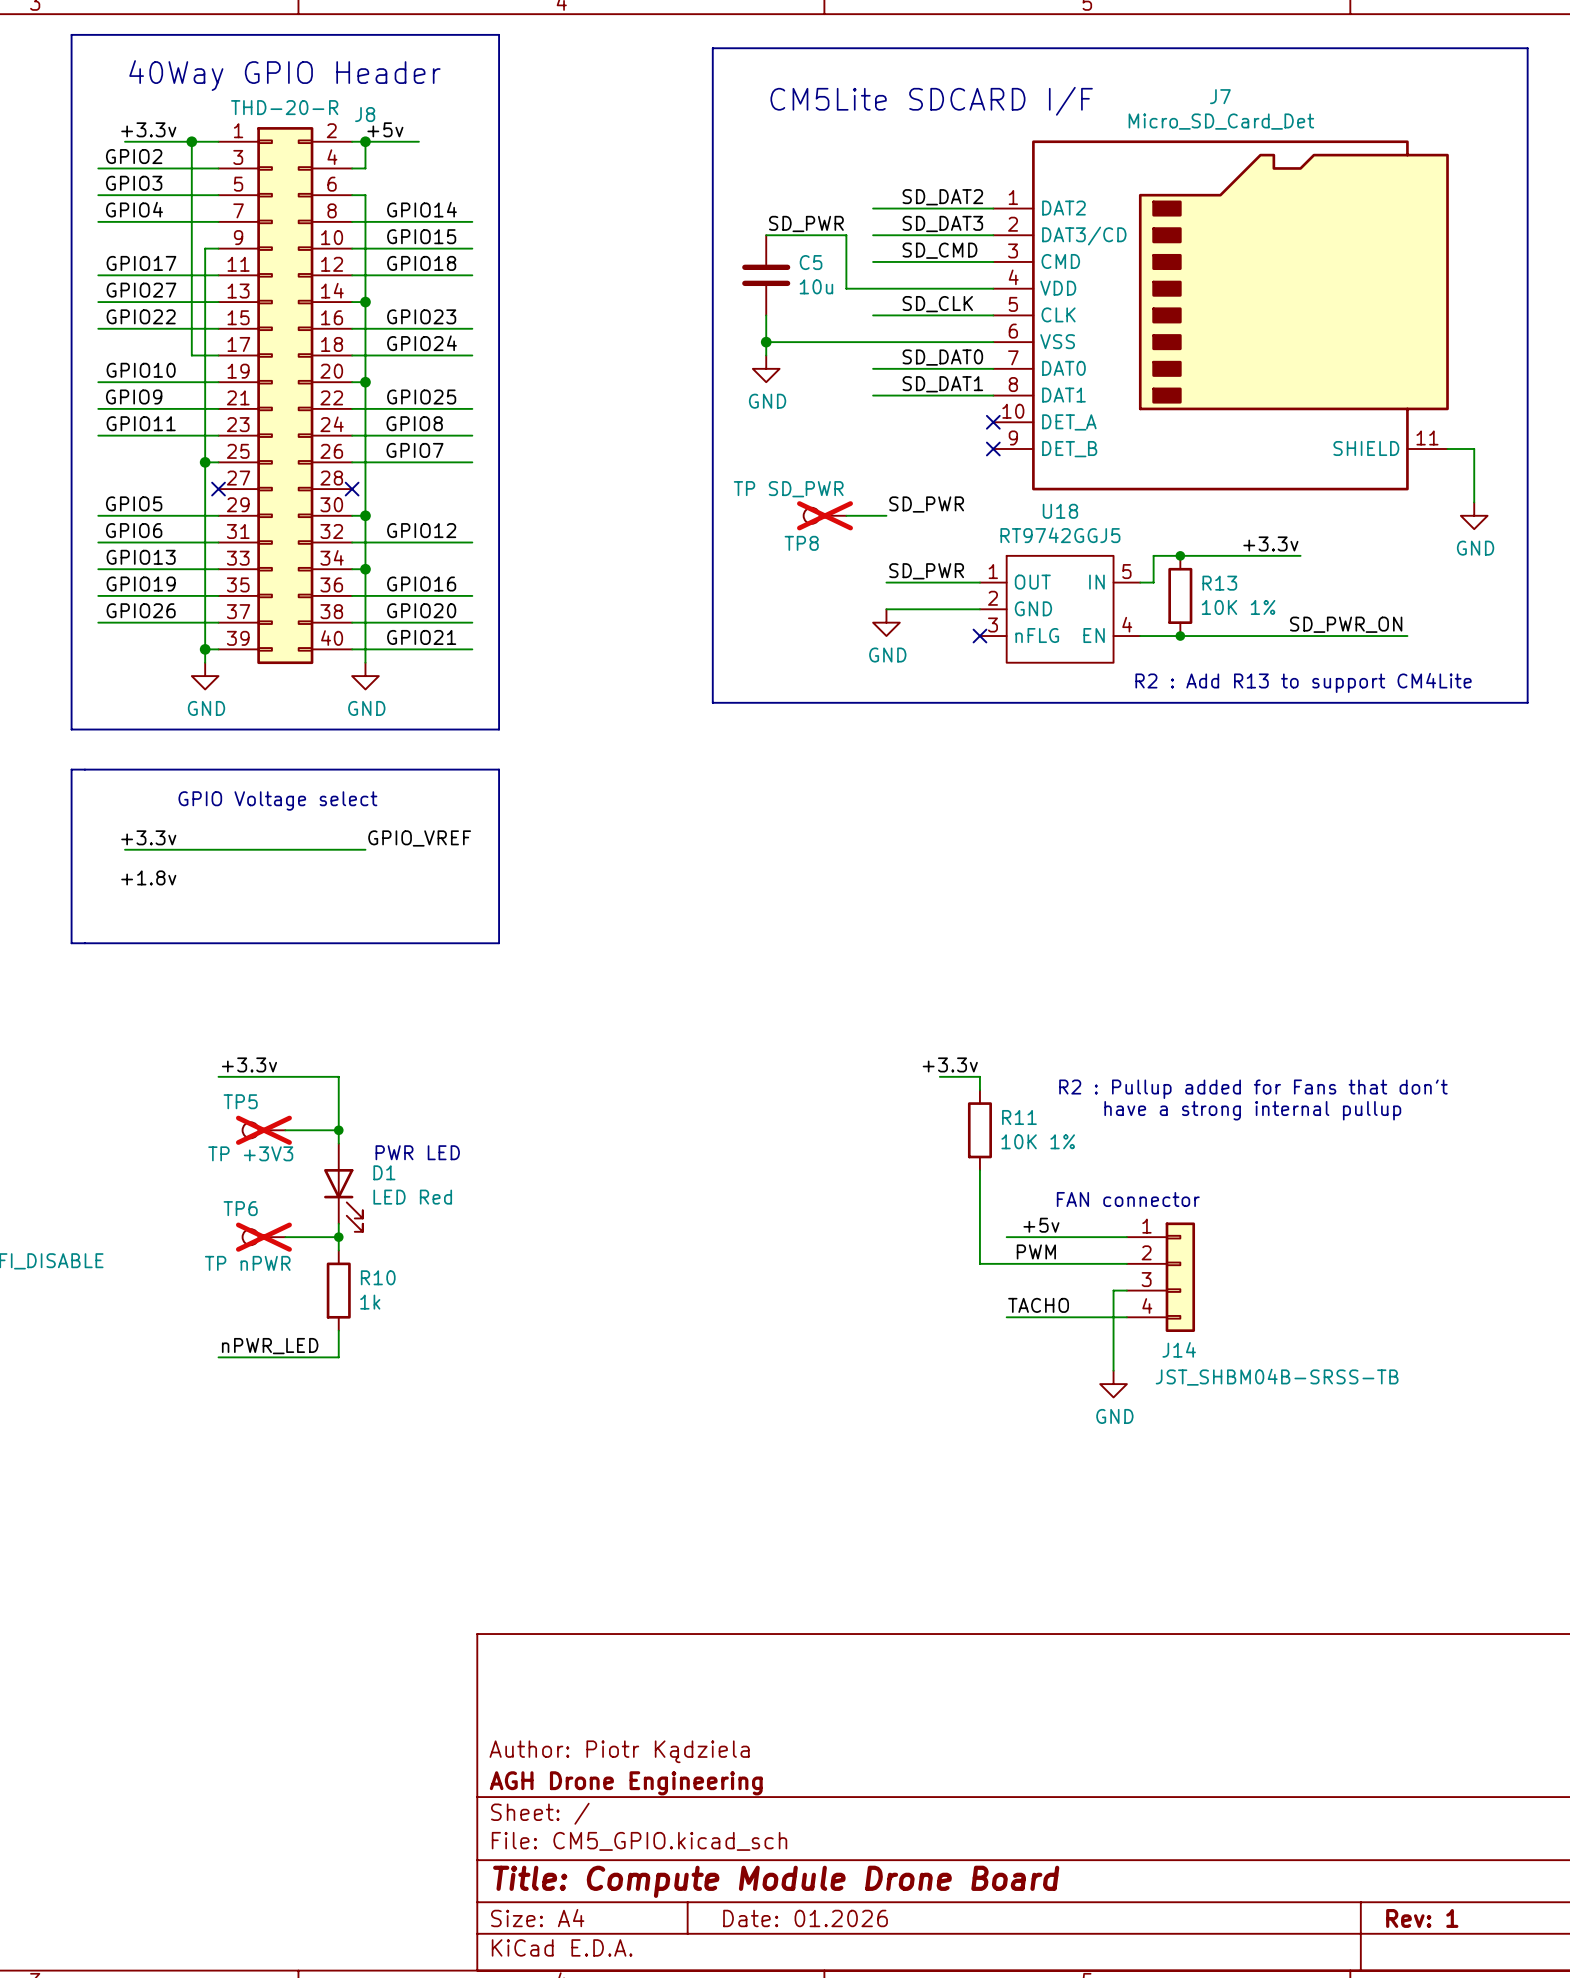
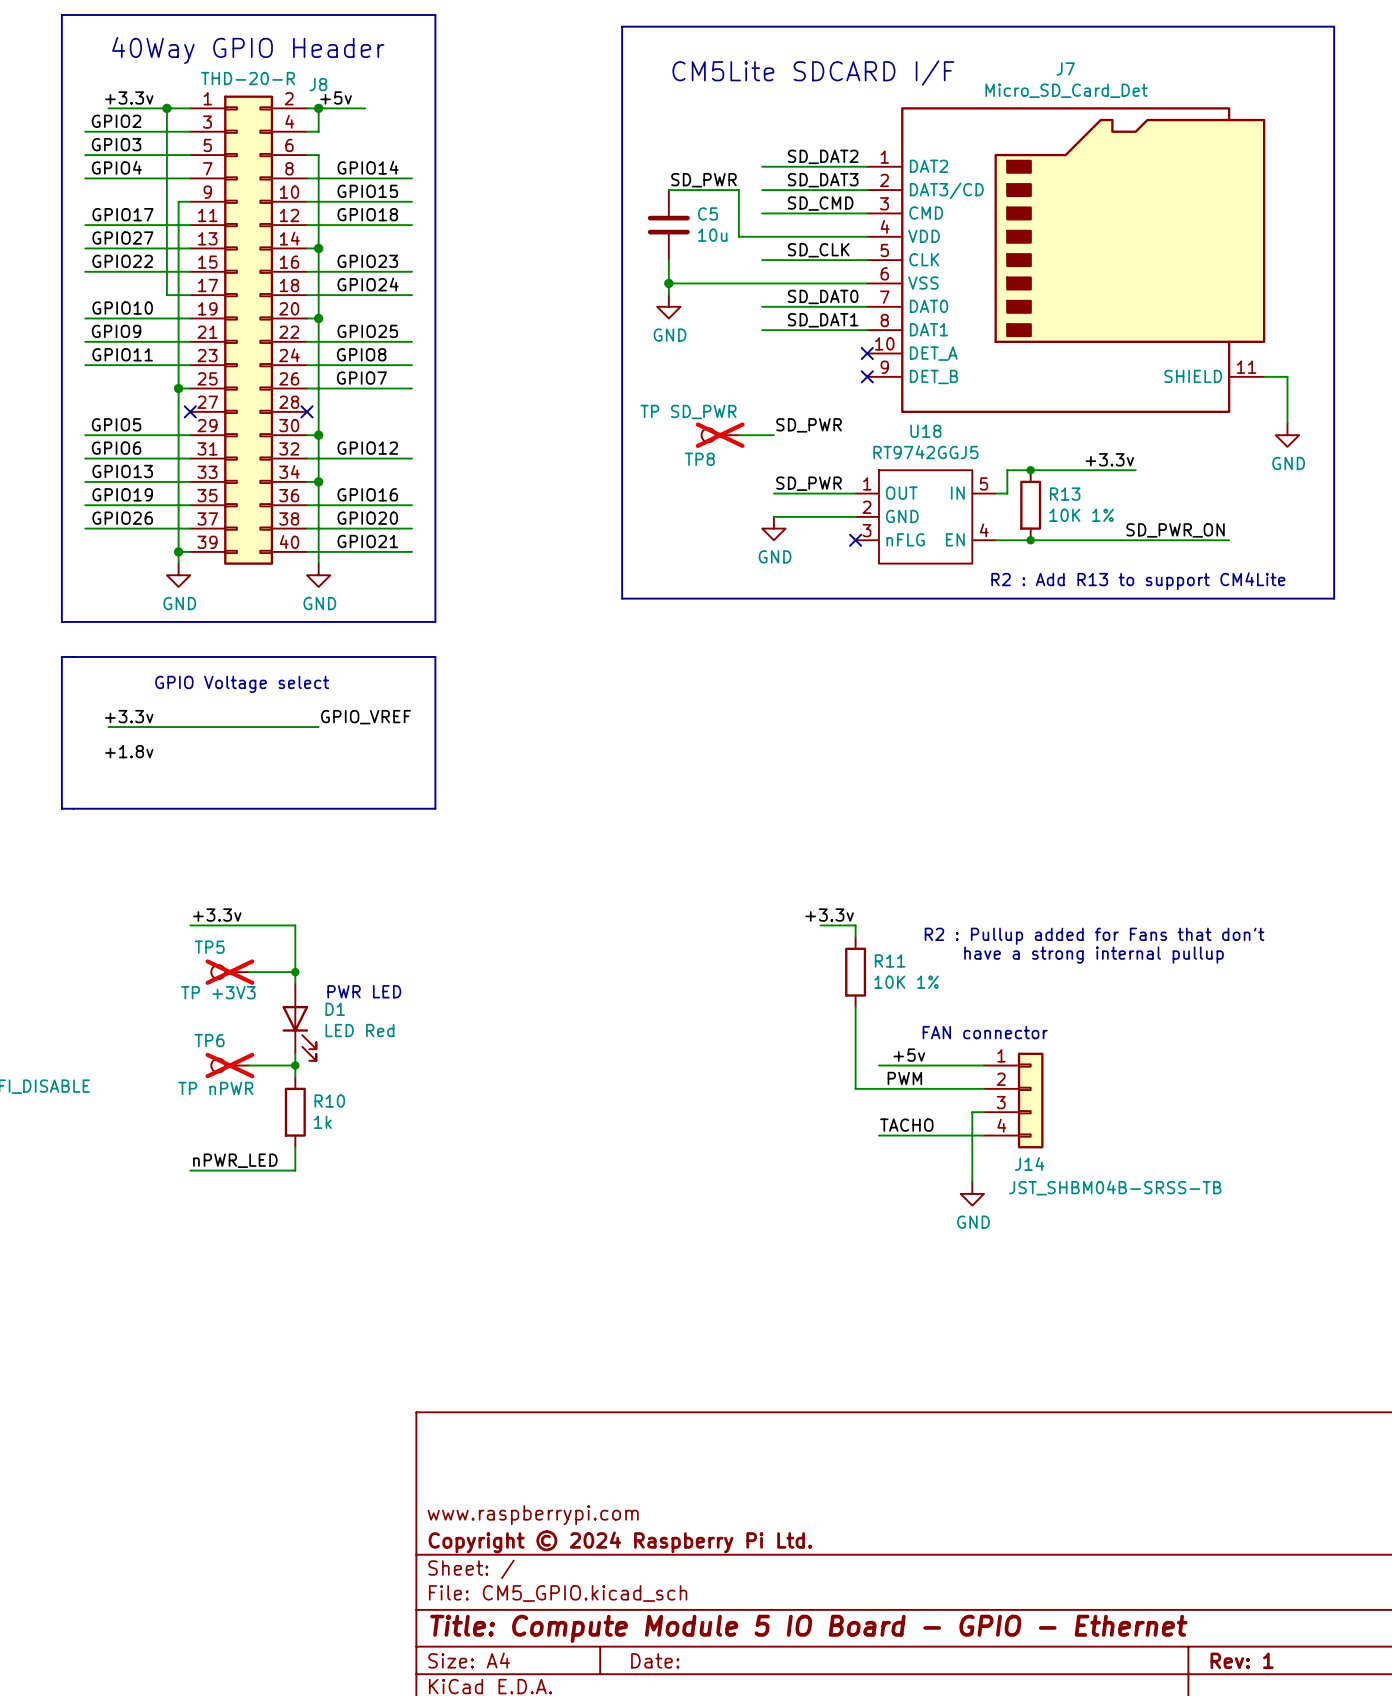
title block: Author: Piotr Kądziela (619, 1751) -> www.raspberrypi.com (533, 1515)
title block: AGH Drone Engineering (626, 1783) -> Copyright © 2024 Raspberry Pi Ltd. (620, 1541)
title block: Title: Compute Module Drone Board (776, 1881) -> Title: Compute Module 5 IO Board - GPIO - Ethernet (808, 1628)
title block: Date: 01.2026 (805, 1918) -> Date: (655, 1660)

